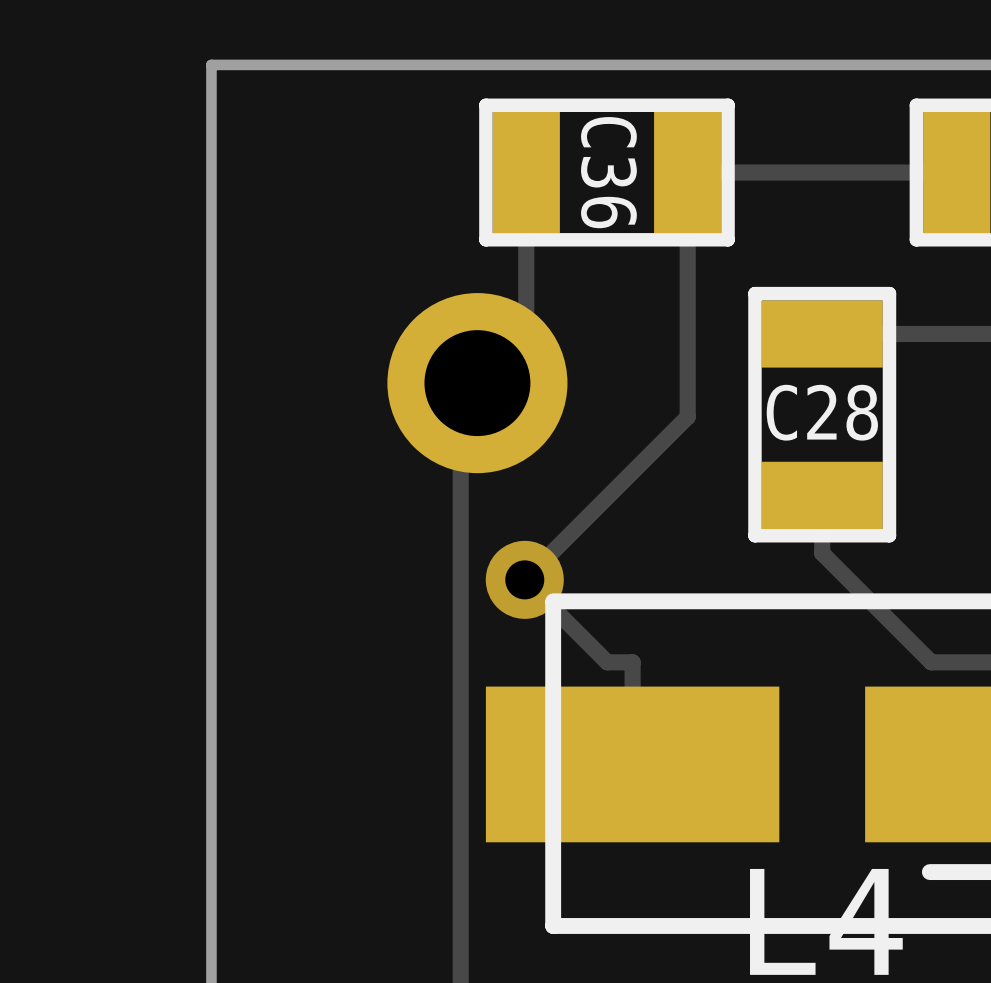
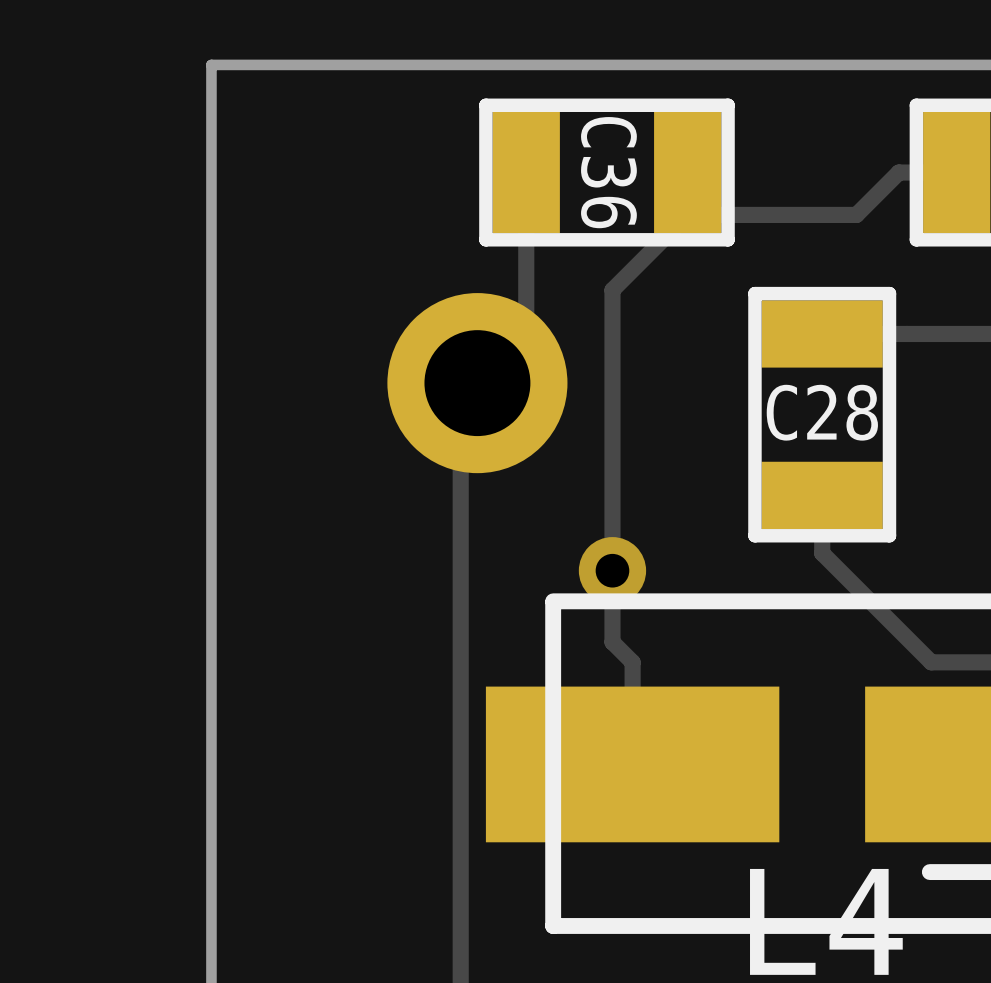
track: (898, 172) (687, 172) -> none
track: (687, 214) (687, 416) (524, 579) (607, 662) (632, 662) -> (898, 172) (856, 214) (687, 214) (612, 290) (612, 642) (632, 662)
via: none -> (612, 570)
via: (524, 579) -> none

